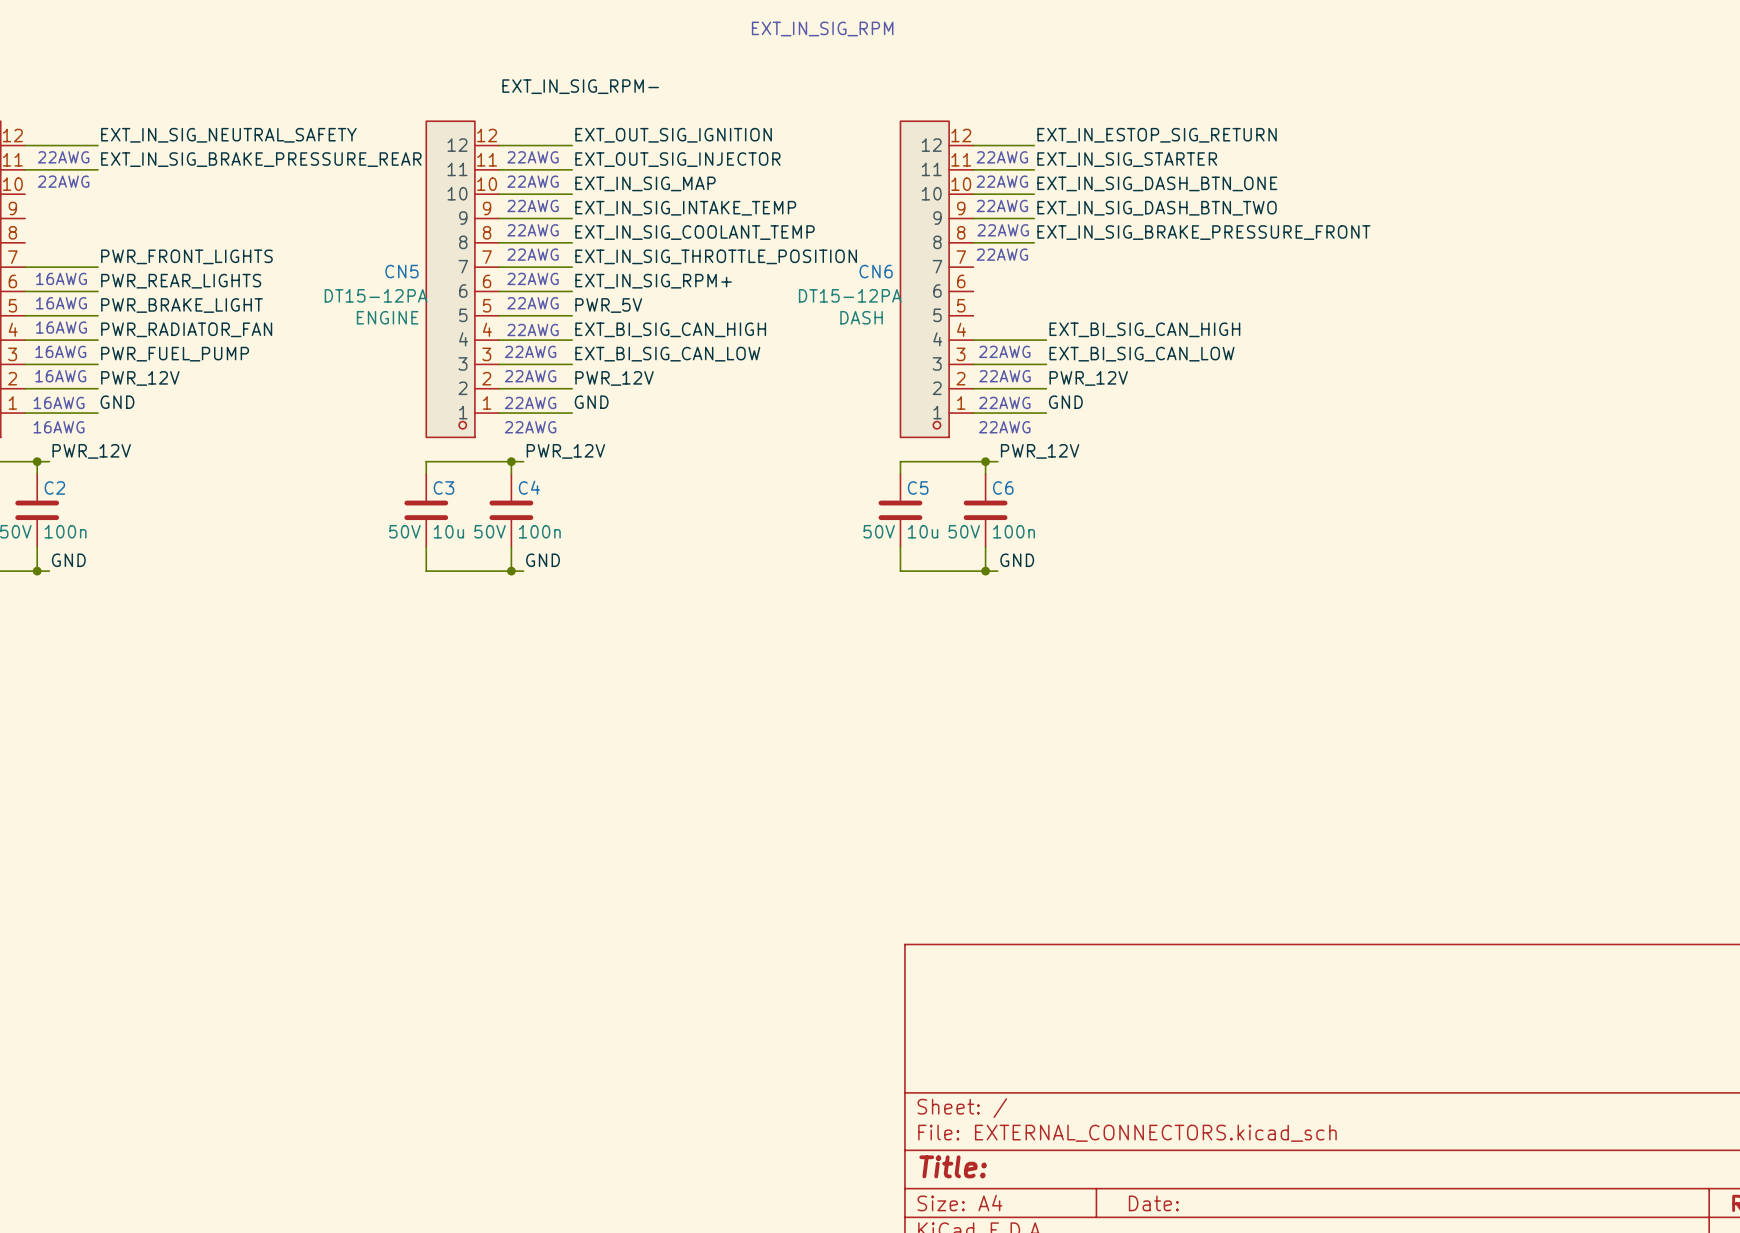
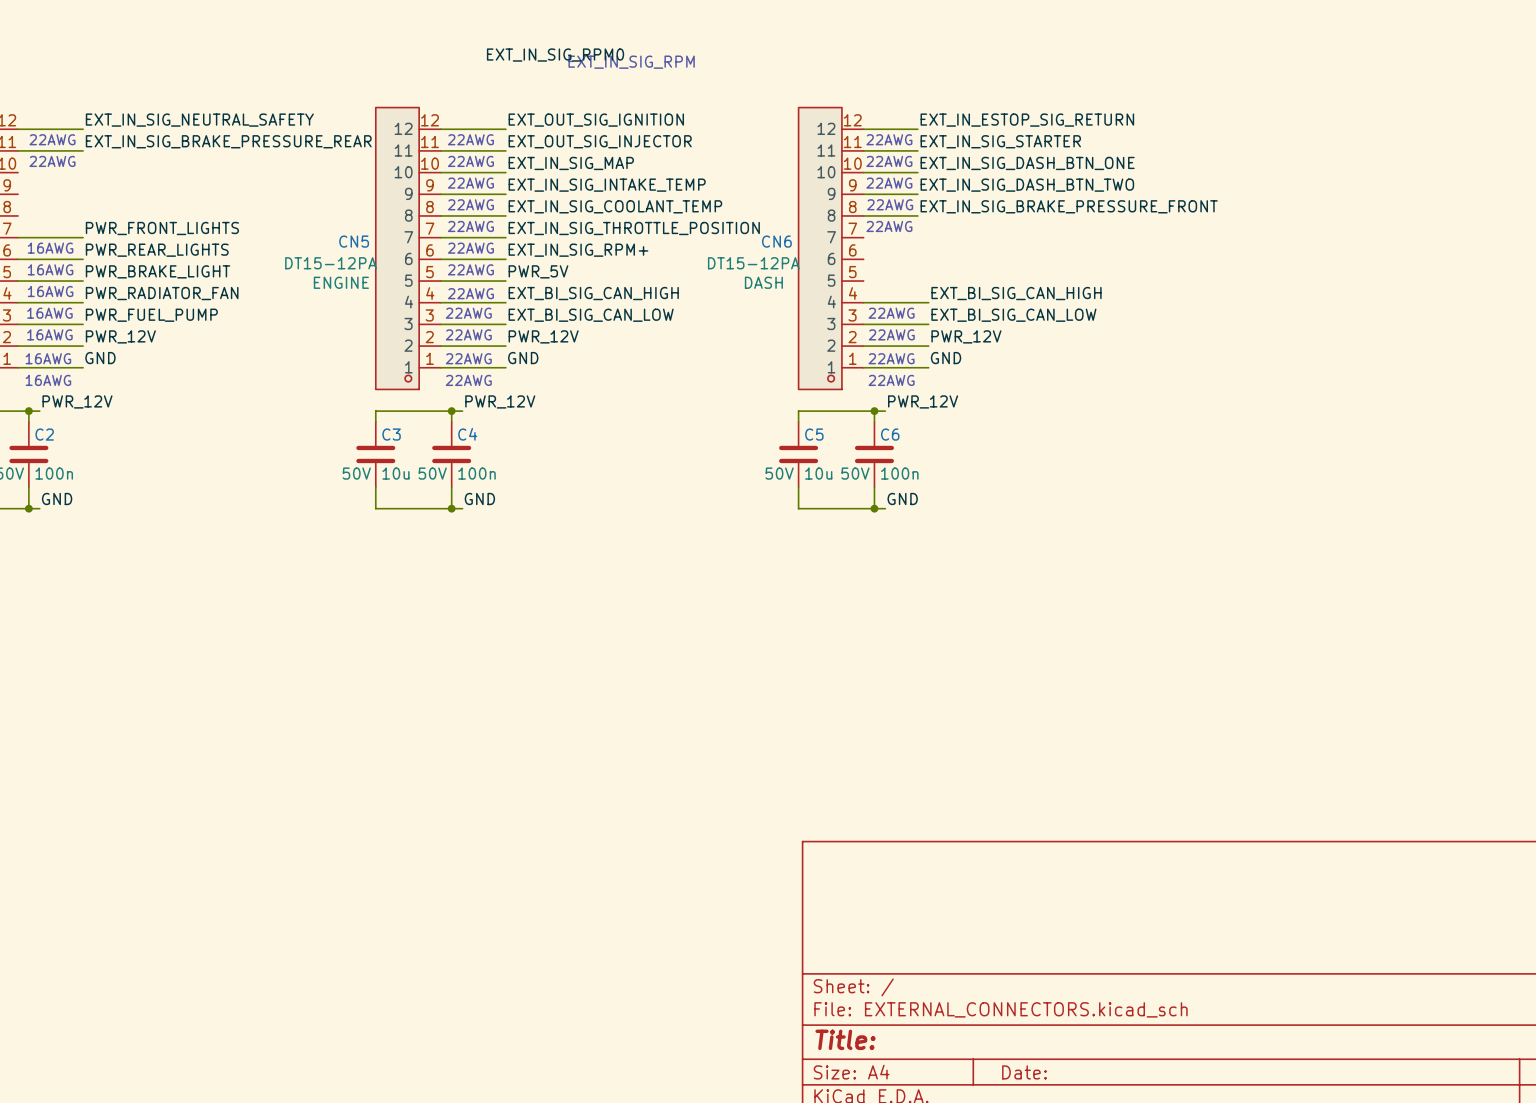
text position: EXT_IN_SIG_RPM (822, 28) -> EXT_IN_SIG_RPM (631, 62)
label: EXT_IN_SIG_RPM- (580, 86) -> EXT_IN_SIG_RPM0 (555, 55)

